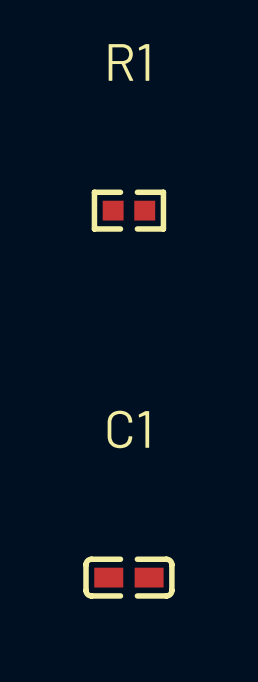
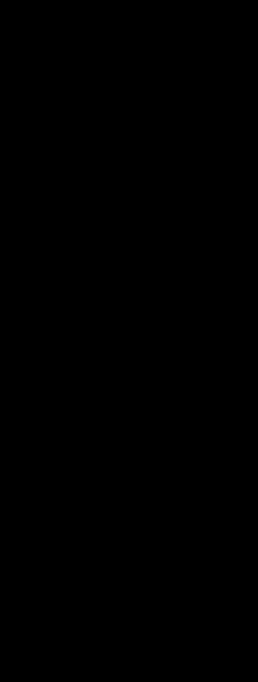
R1: (128, 210) -> none
C1: (128, 577) -> none

